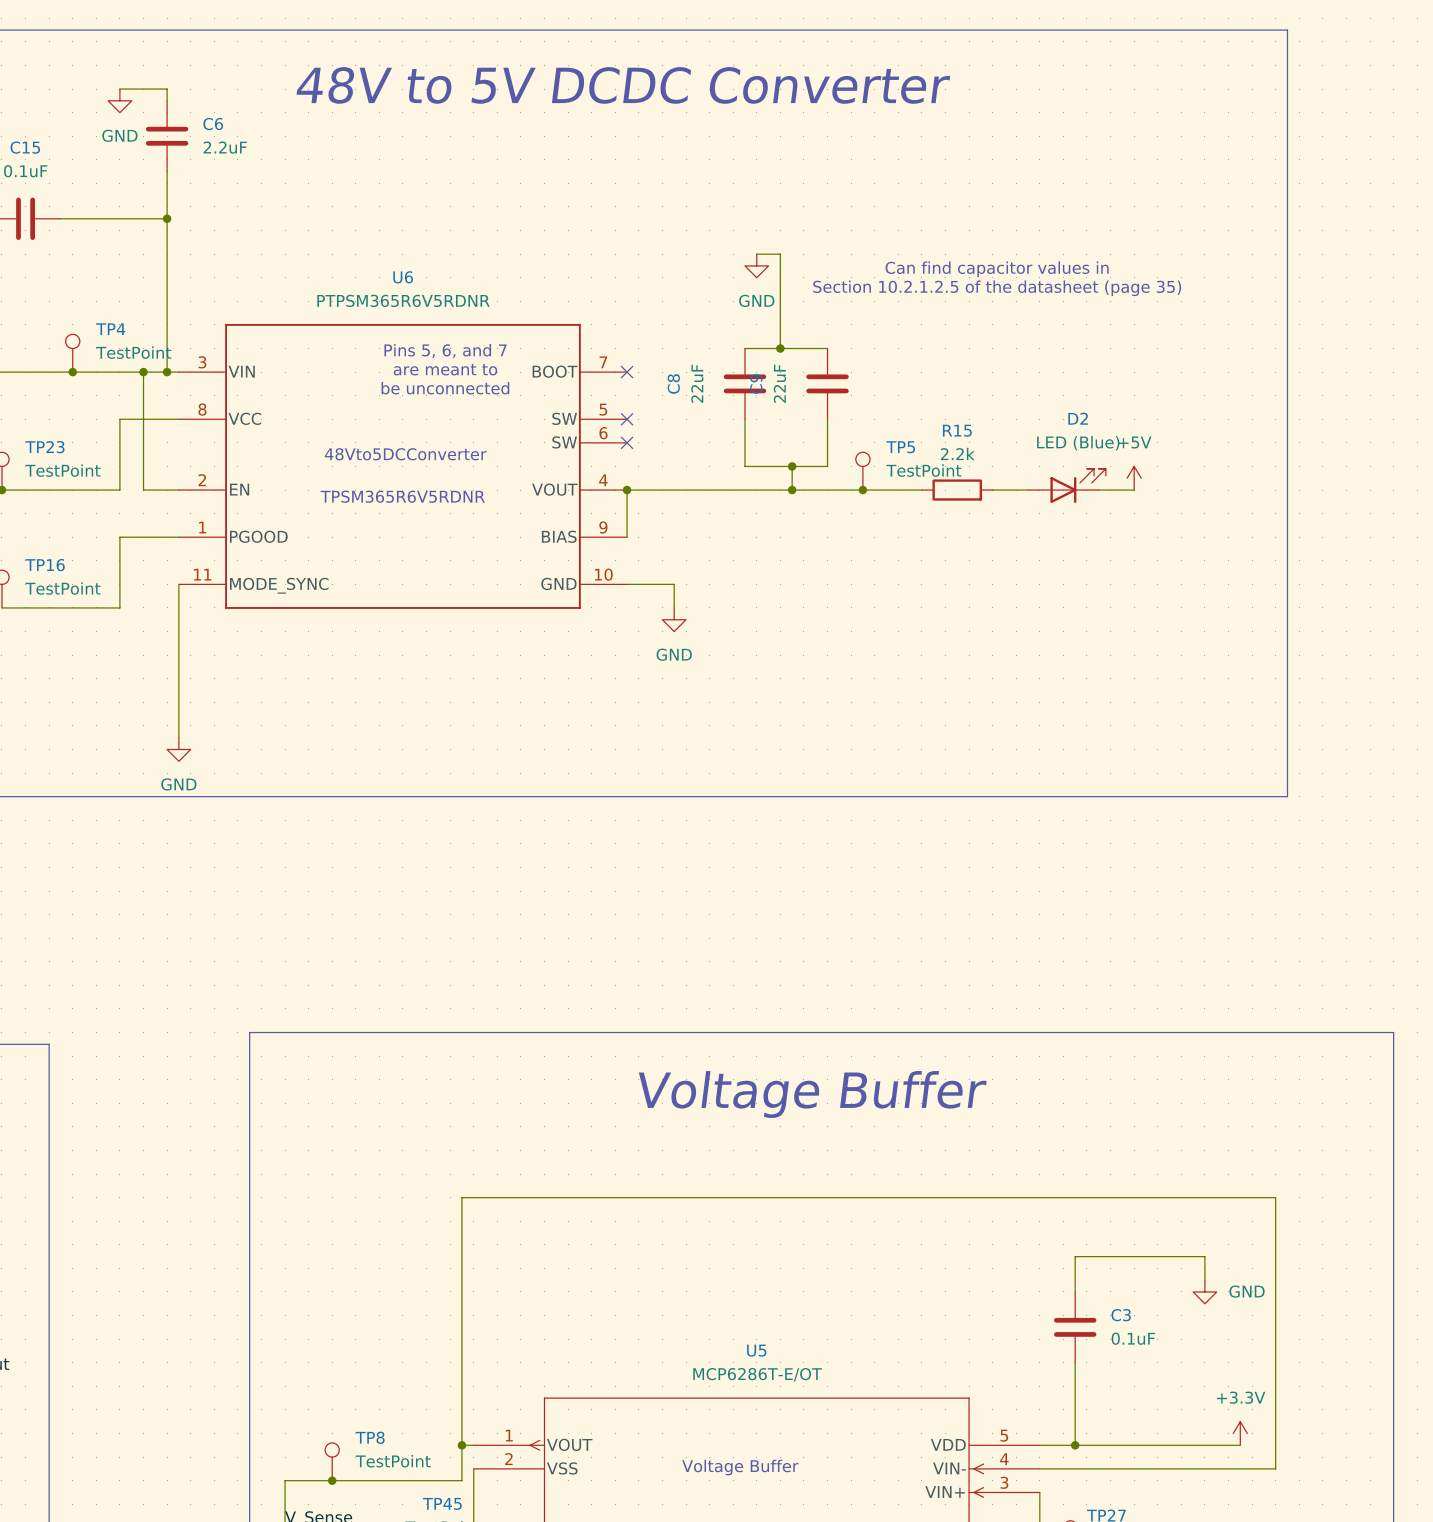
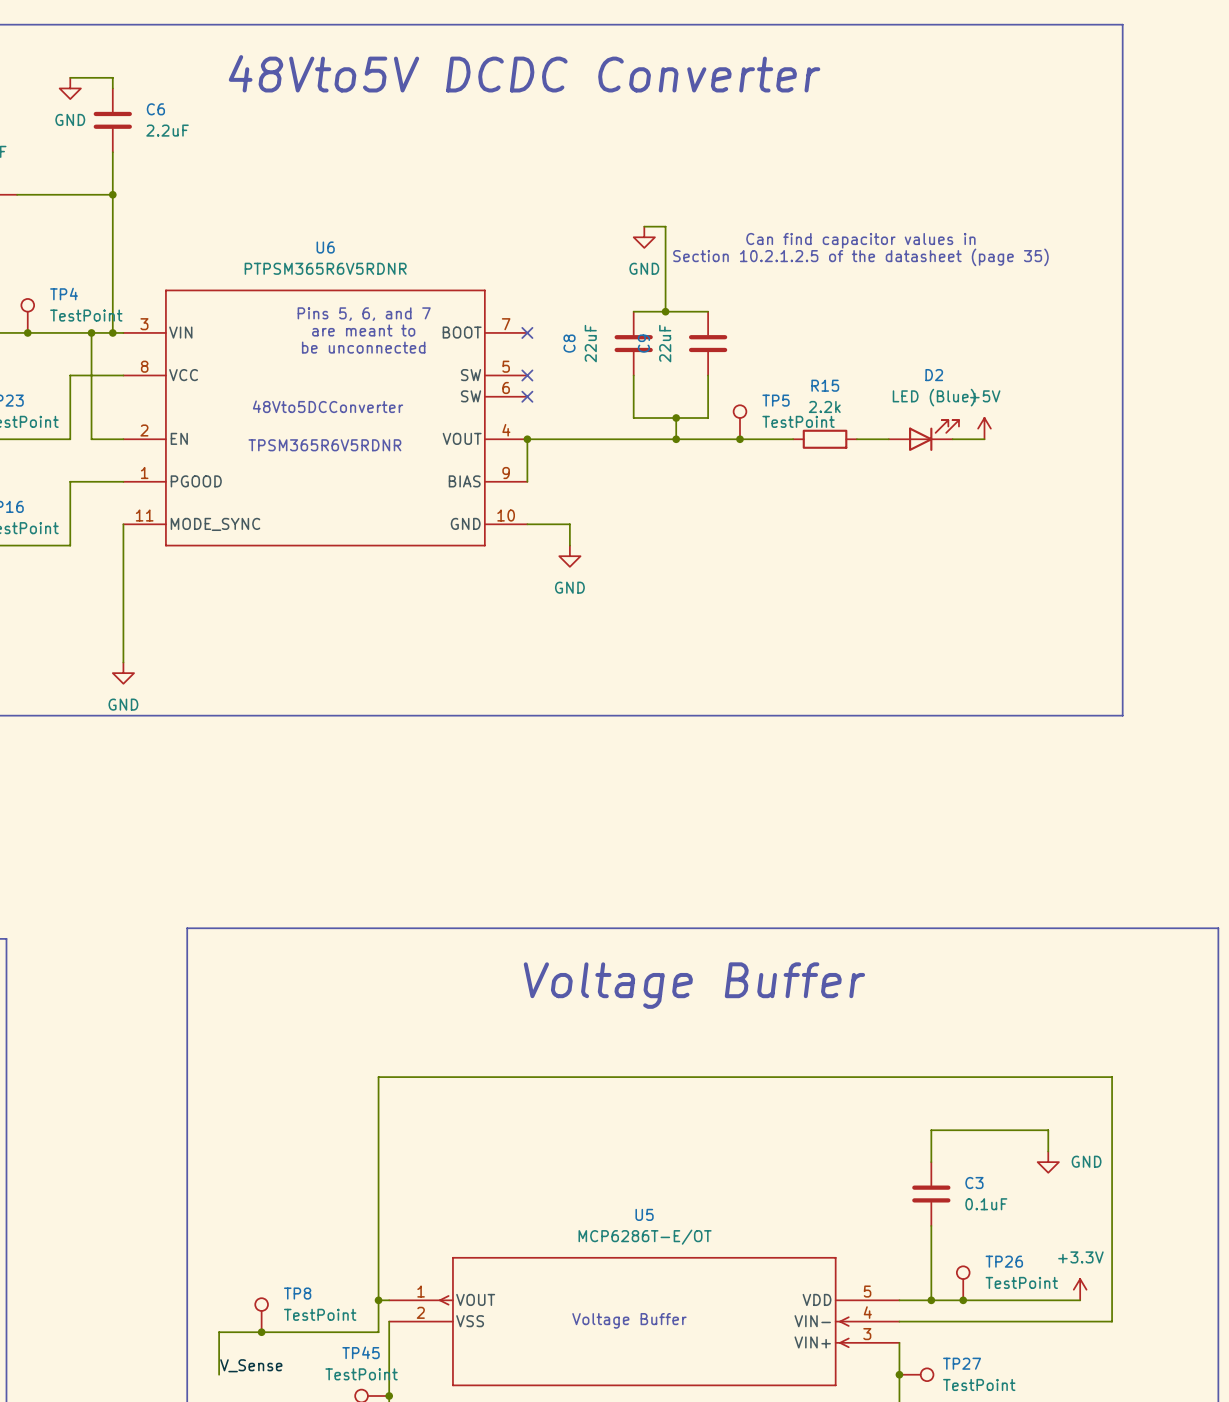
text: 48V to 5V DCDC Converter (623, 85) -> 48Vto5V DCDC Converter (524, 73)
TP26: none -> TestPoint (963, 1283)
junction: none -> (963, 1300)

